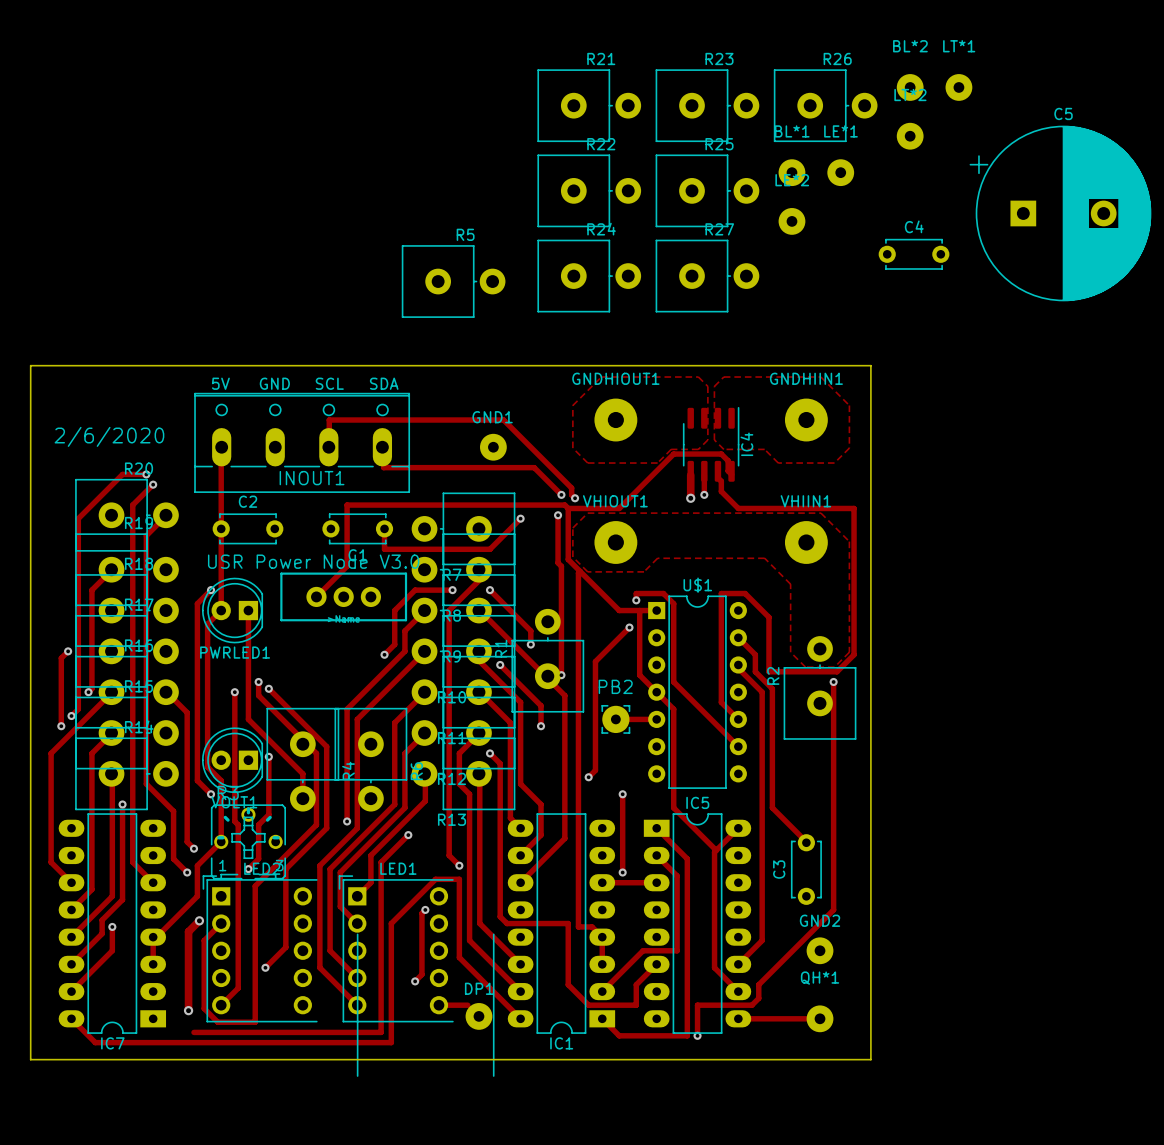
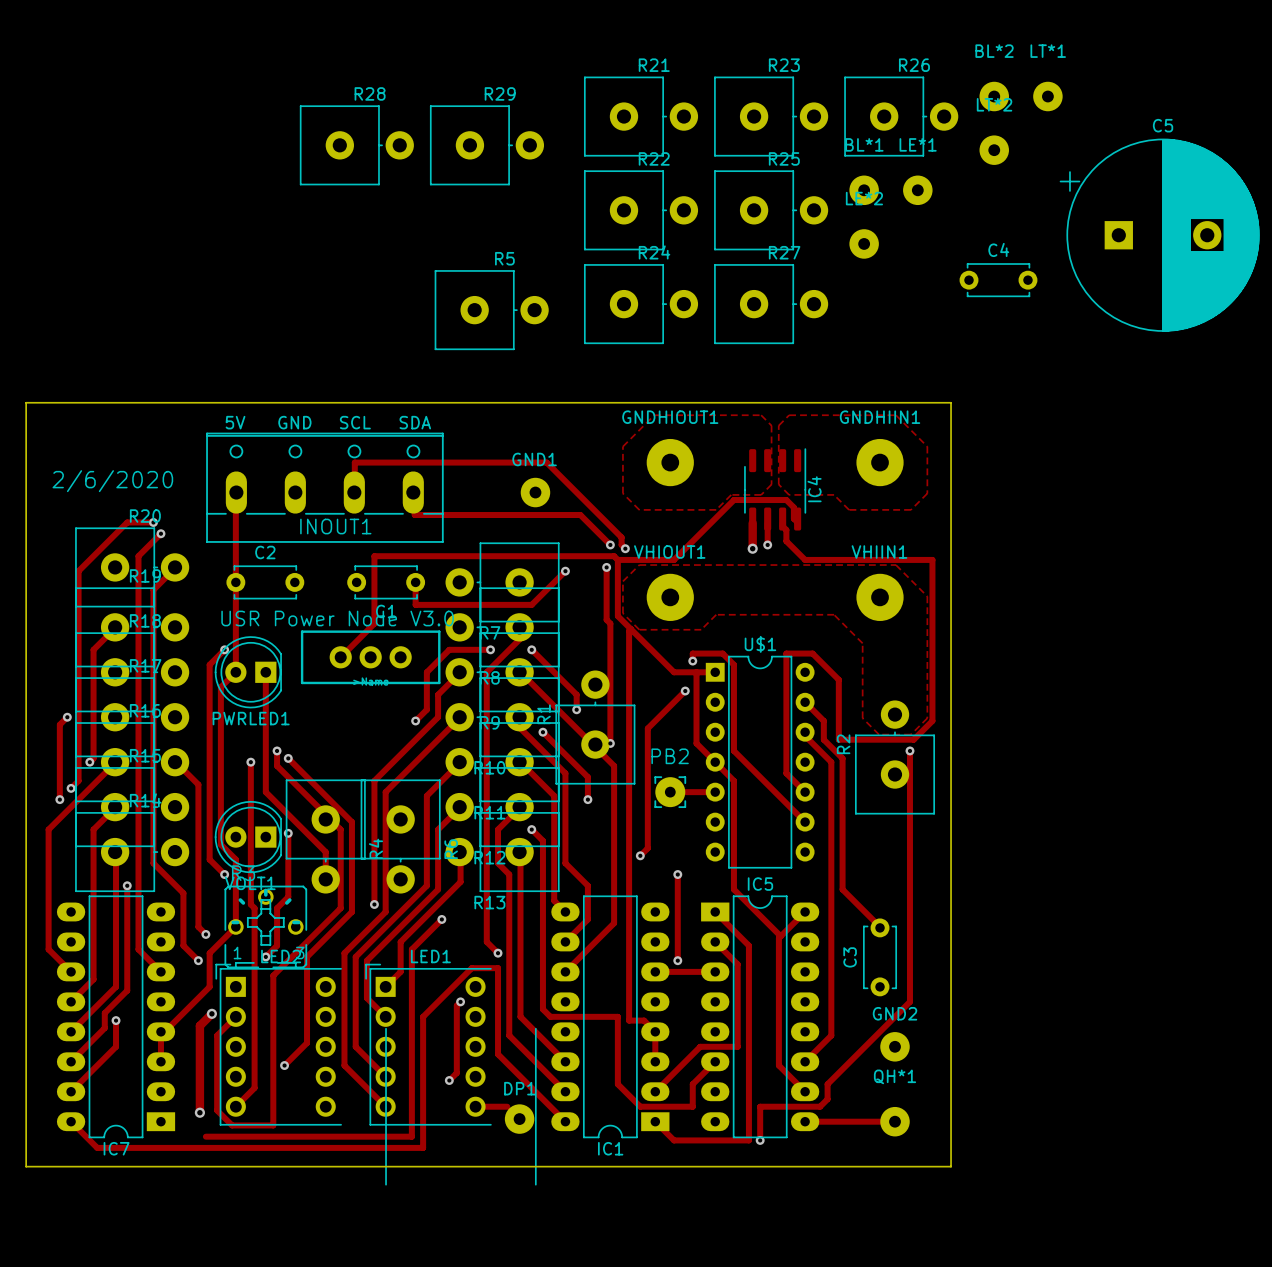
R28: none -> (356, 145)
R29: none -> (487, 145)

